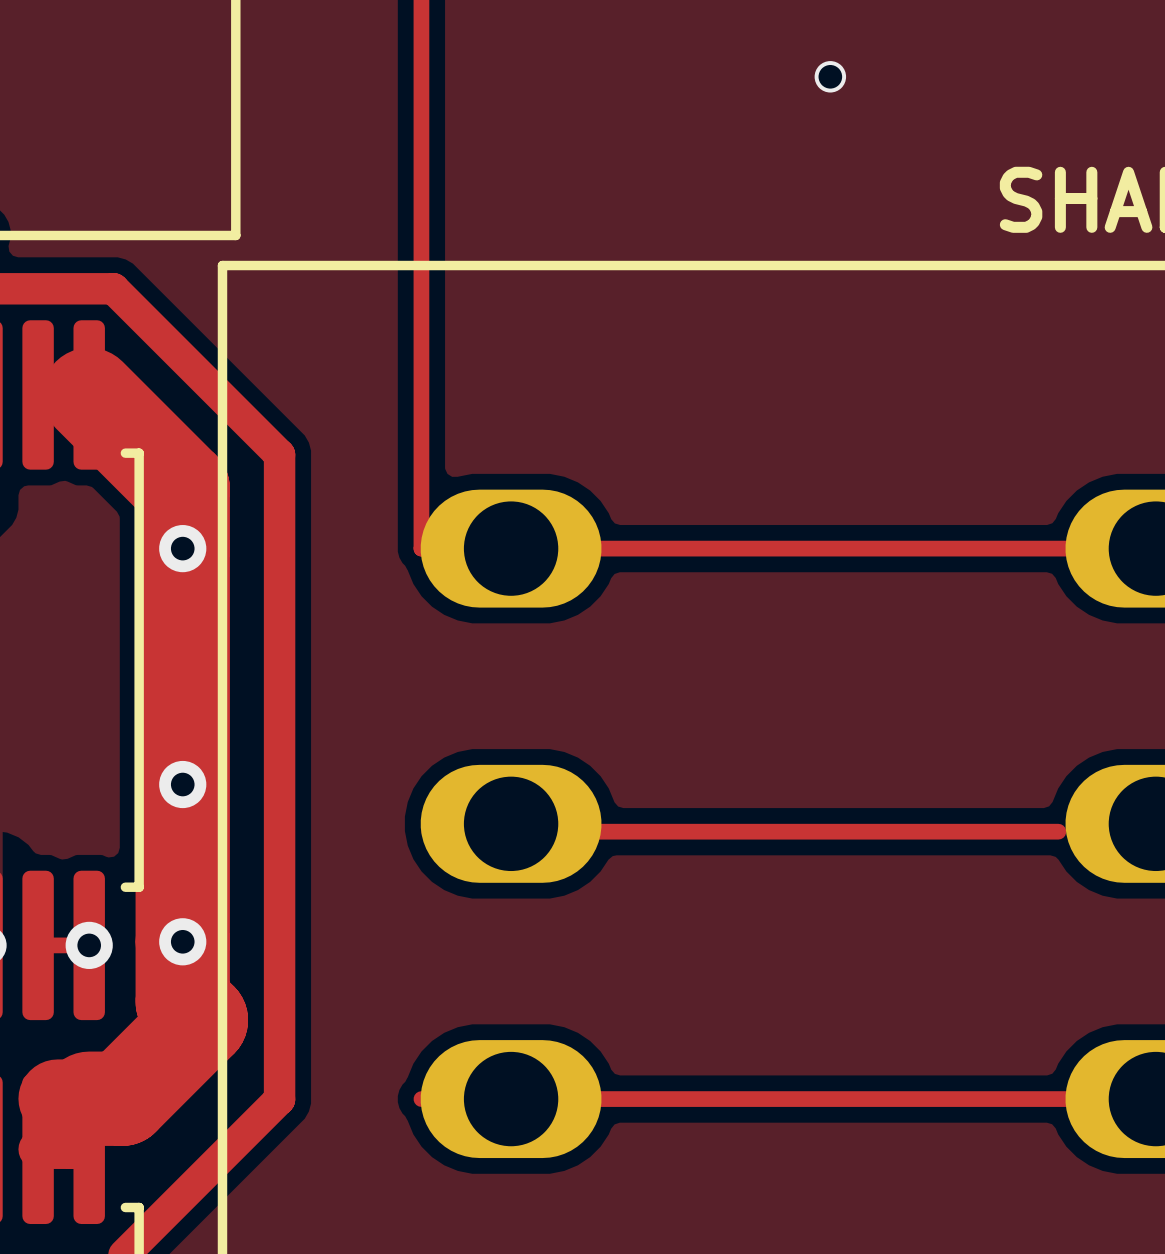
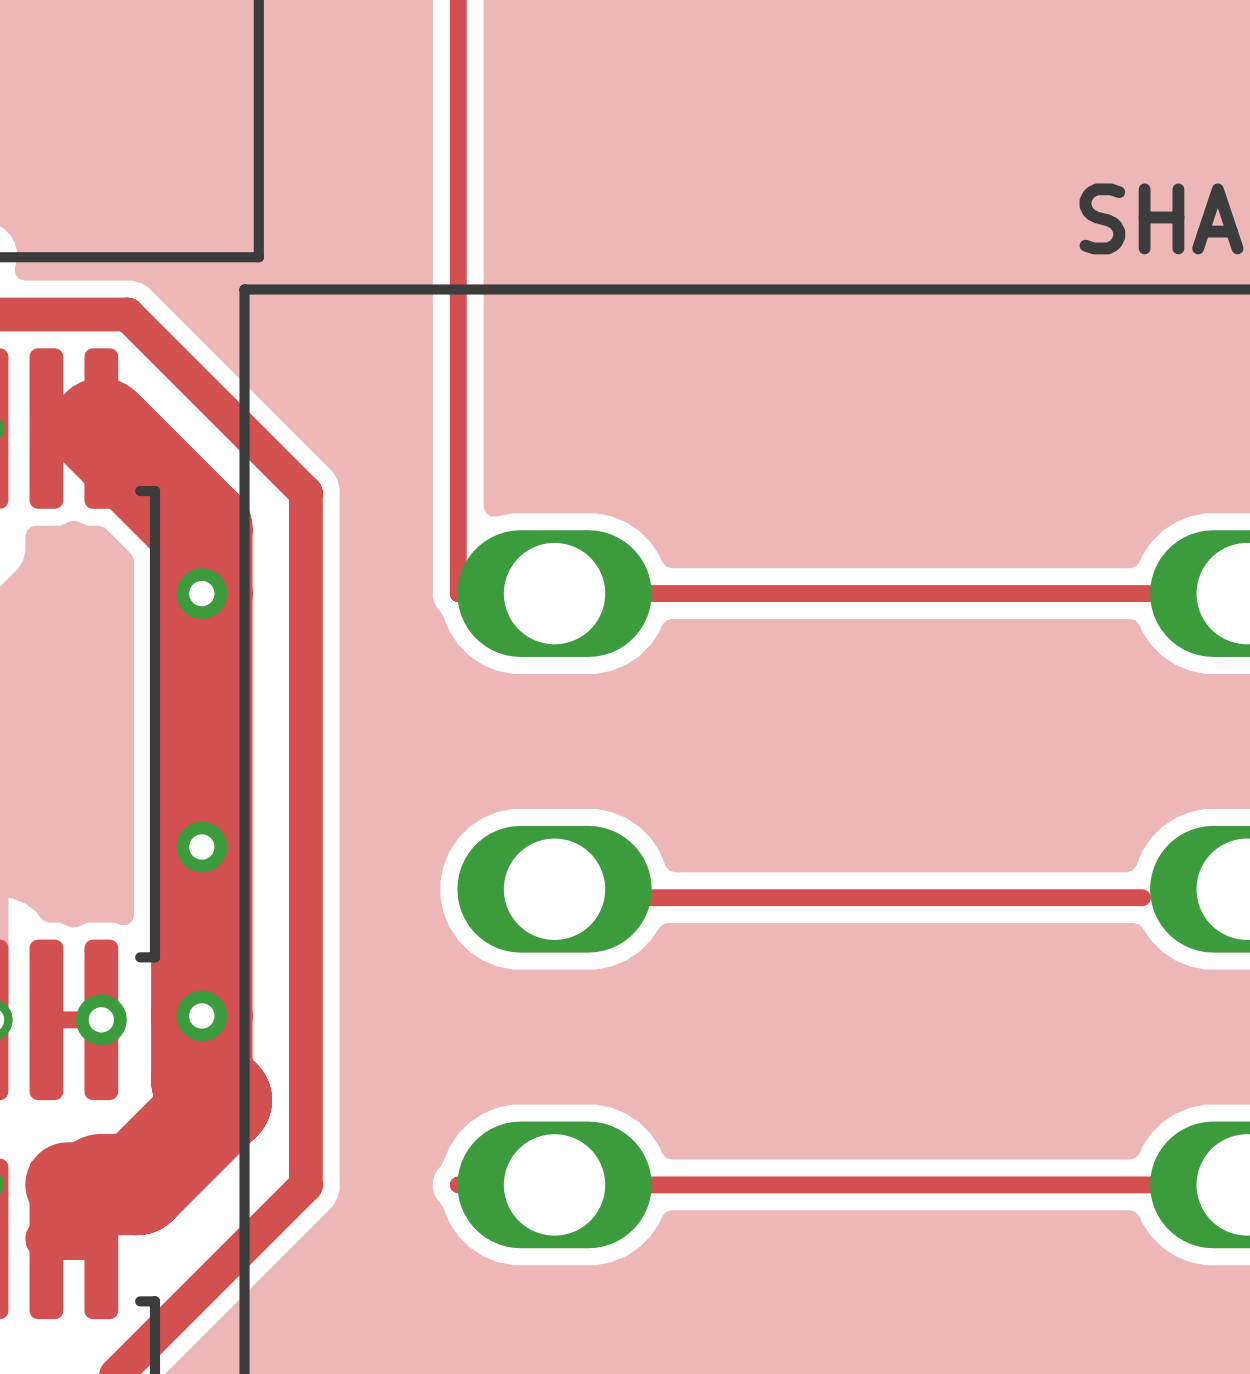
via: (830, 76) -> none

